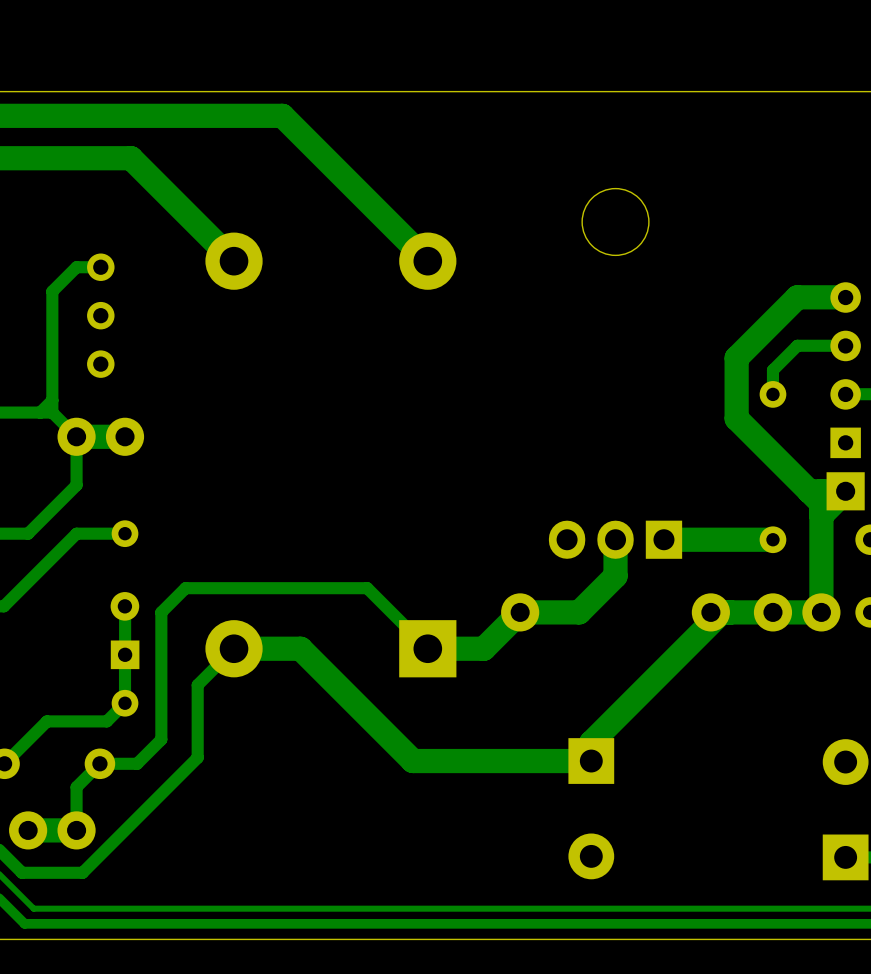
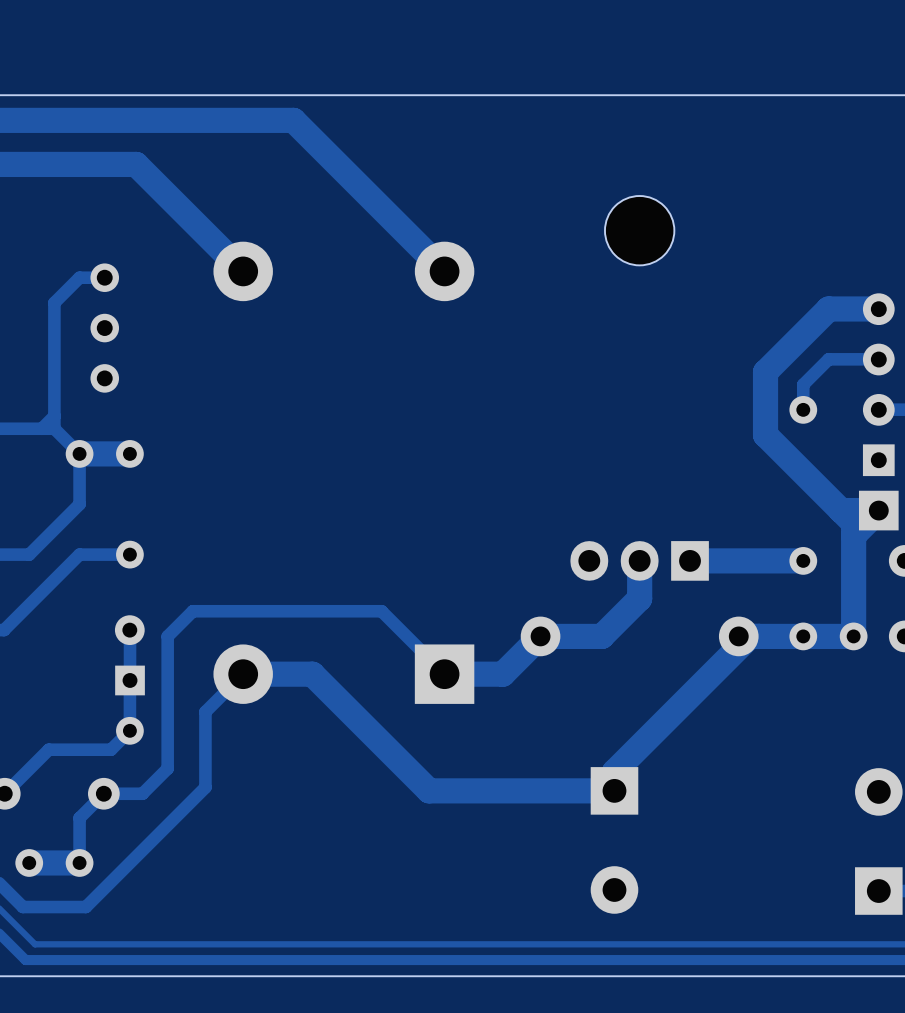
part footprint: [57, 417, 145, 456] -> [65, 440, 144, 468]
part footprint: [753, 593, 841, 632] -> [789, 622, 868, 651]
part footprint: [9, 811, 96, 850] -> [15, 849, 94, 877]

